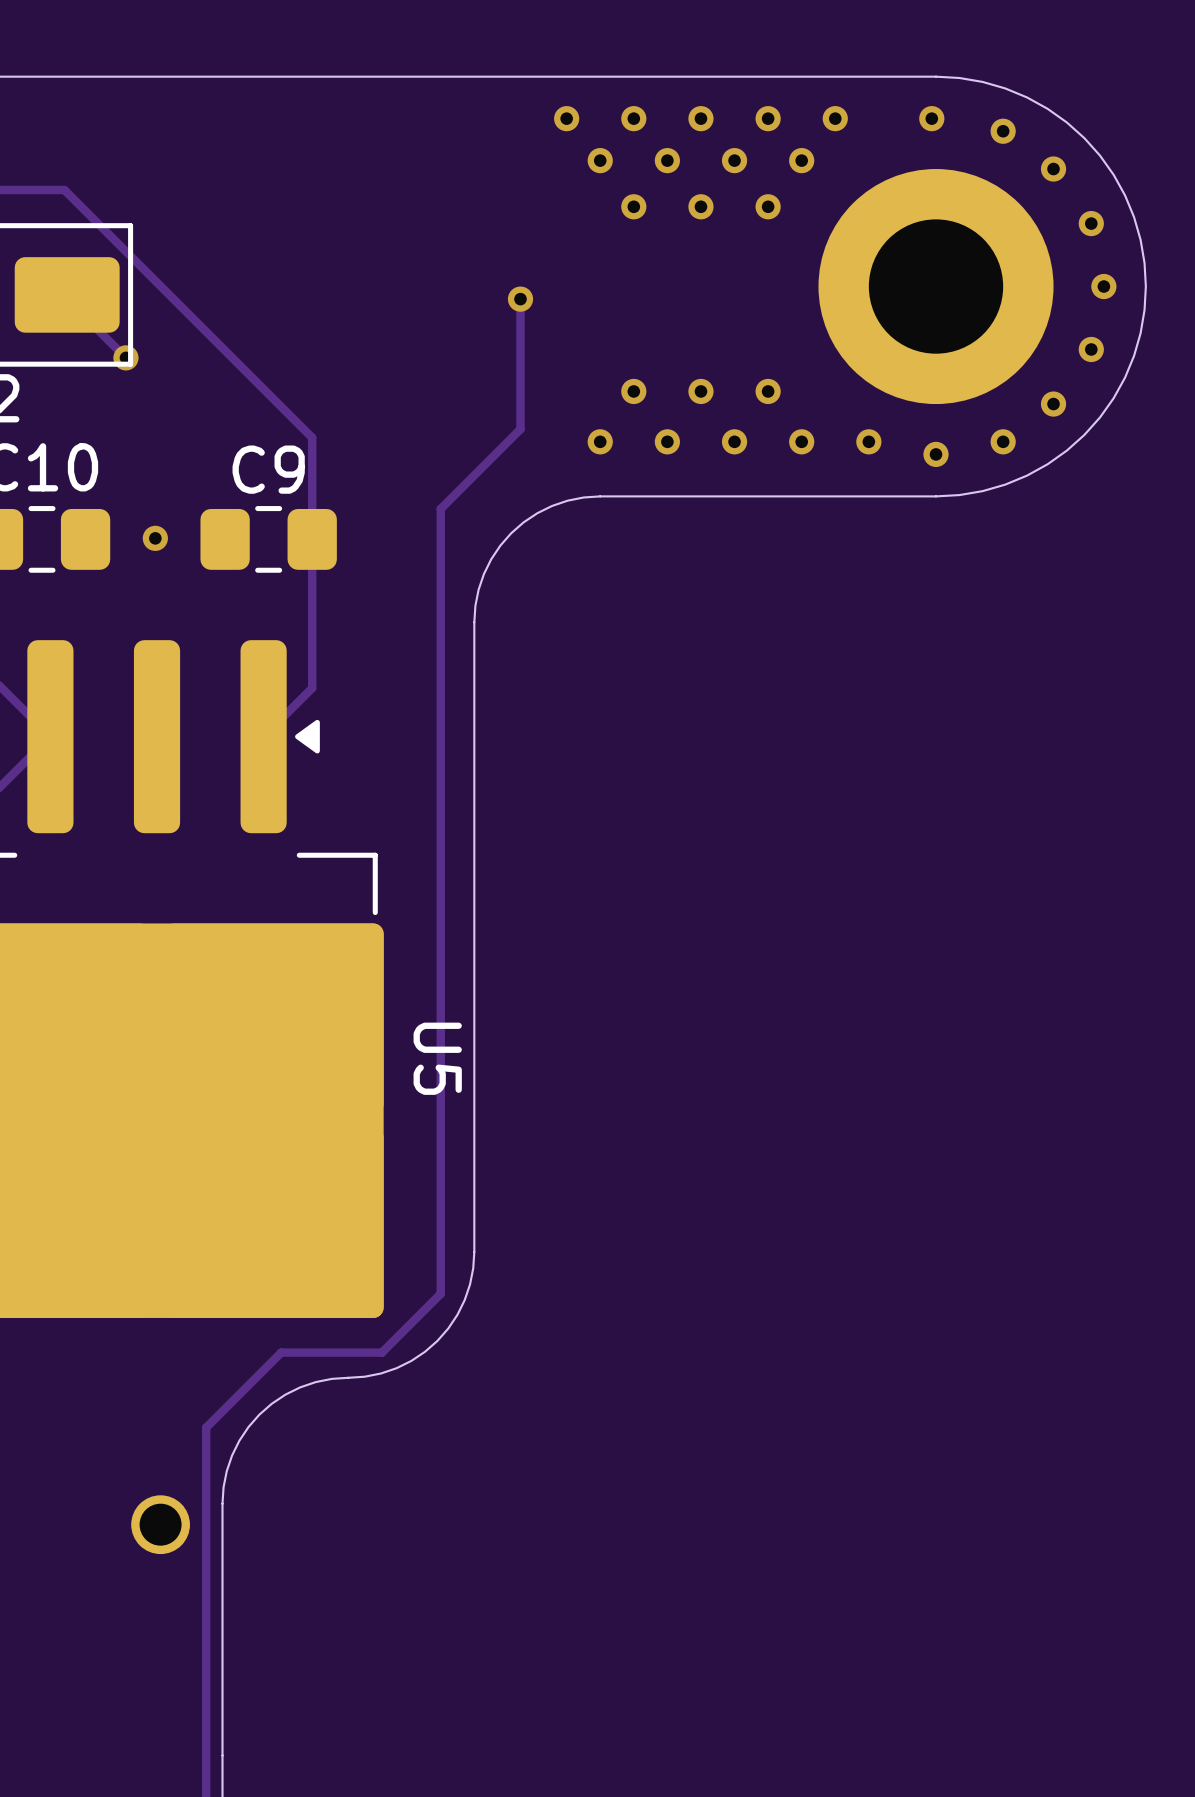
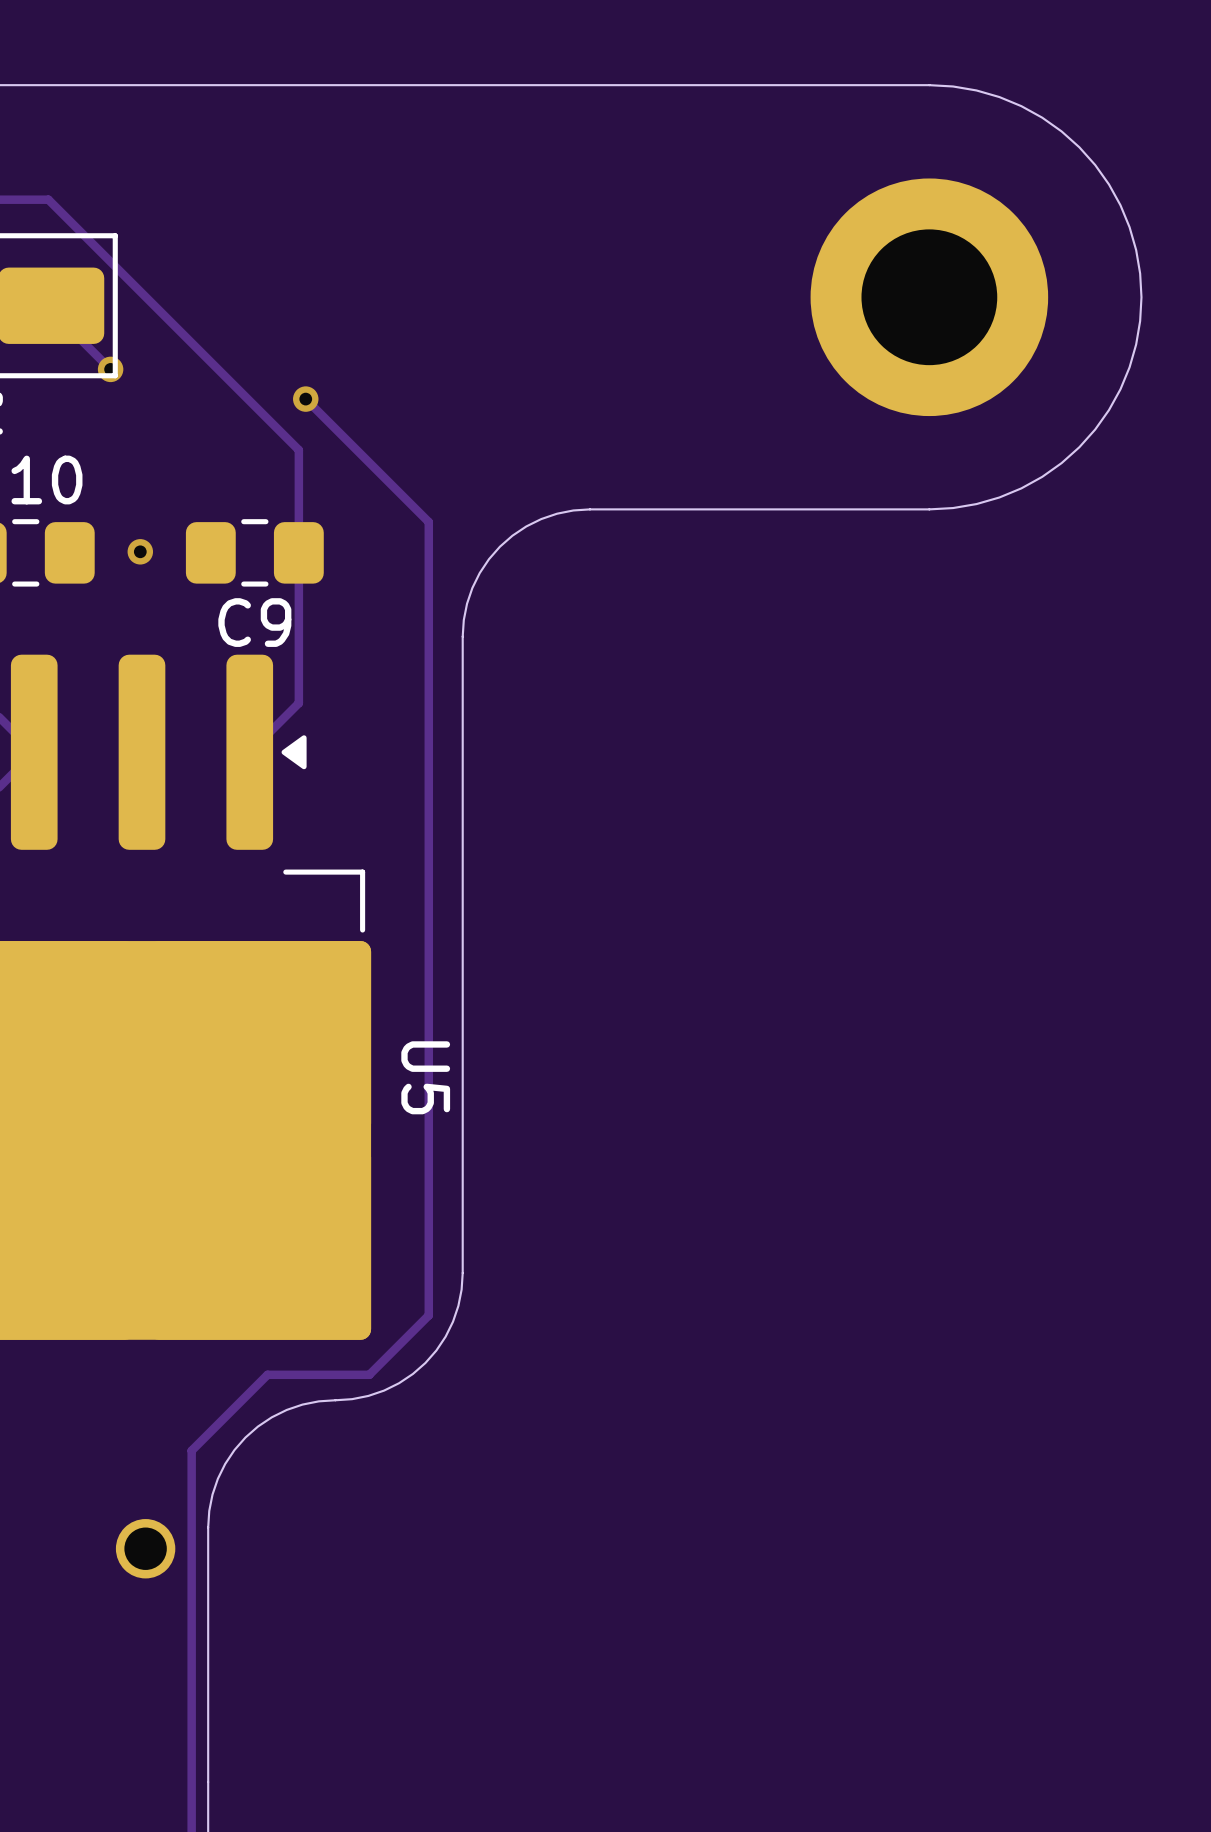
via: (566, 118) -> none
via: (633, 118) -> none
via: (700, 118) -> none
via: (768, 118) -> none
via: (835, 118) -> none
via: (931, 118) -> none
via: (1003, 131) -> none
via: (600, 160) -> none
via: (667, 160) -> none
via: (734, 160) -> none
via: (801, 160) -> none
via: (1053, 169) -> none
via: (633, 206) -> none
via: (700, 206) -> none
via: (768, 206) -> none
via: (1091, 223) -> none
via: (1103, 286) -> none
track: (520, 299) (520, 429) (440, 508) -> (305, 399) (428, 522)
via: (520, 299) -> none
via: (1091, 349) -> none
via: none -> (305, 399)
via: (633, 391) -> none
via: (700, 391) -> none
via: (768, 391) -> none
via: (1053, 404) -> none
via: (600, 441) -> none
via: (667, 441) -> none
via: (734, 441) -> none
via: (801, 441) -> none
via: (868, 441) -> none
via: (1003, 441) -> none
via: (936, 454) -> none
C9 name position: C9 (268, 469) -> C9 (254, 622)

